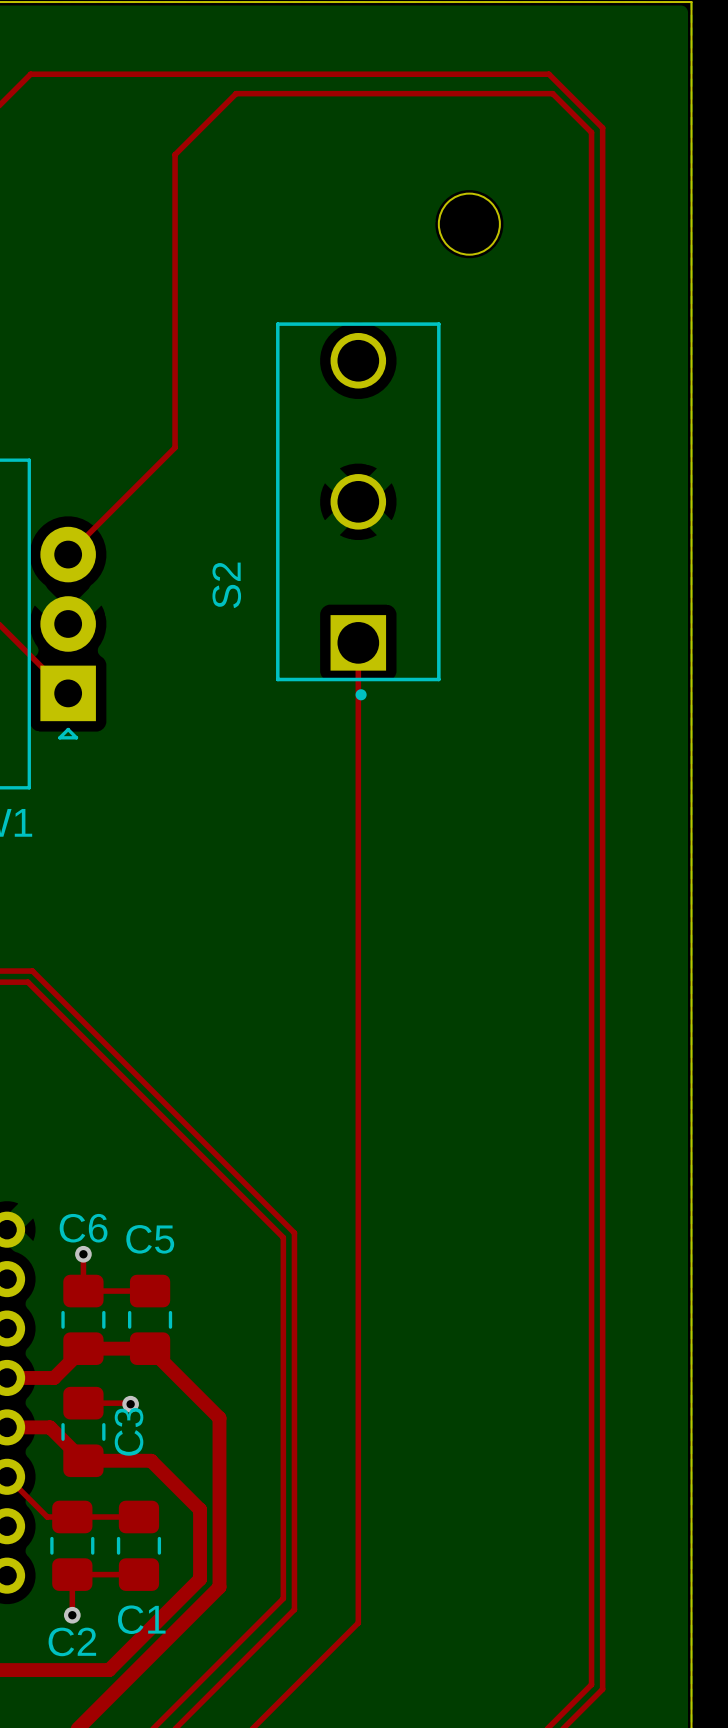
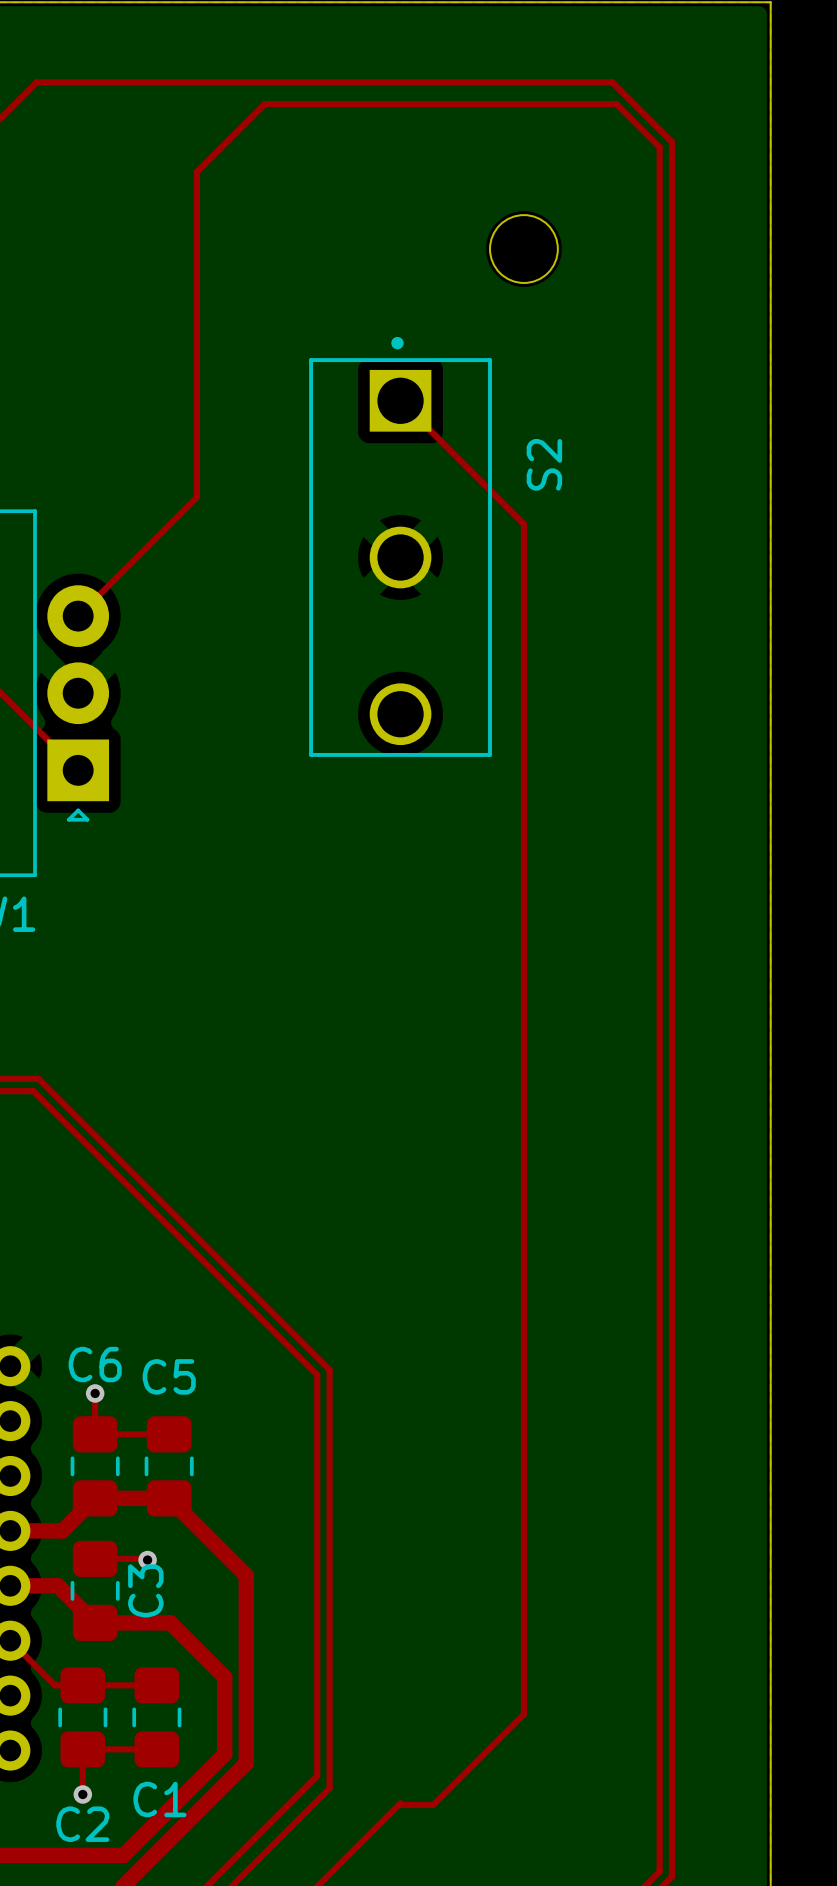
top track: none -> (400, 400) (523, 524) (523, 1714) (433, 1804) (398, 1804)
S2 rotation: 0° (358, 511) -> 180° (400, 546)
top track: (358, 642) (358, 1622) -> none

